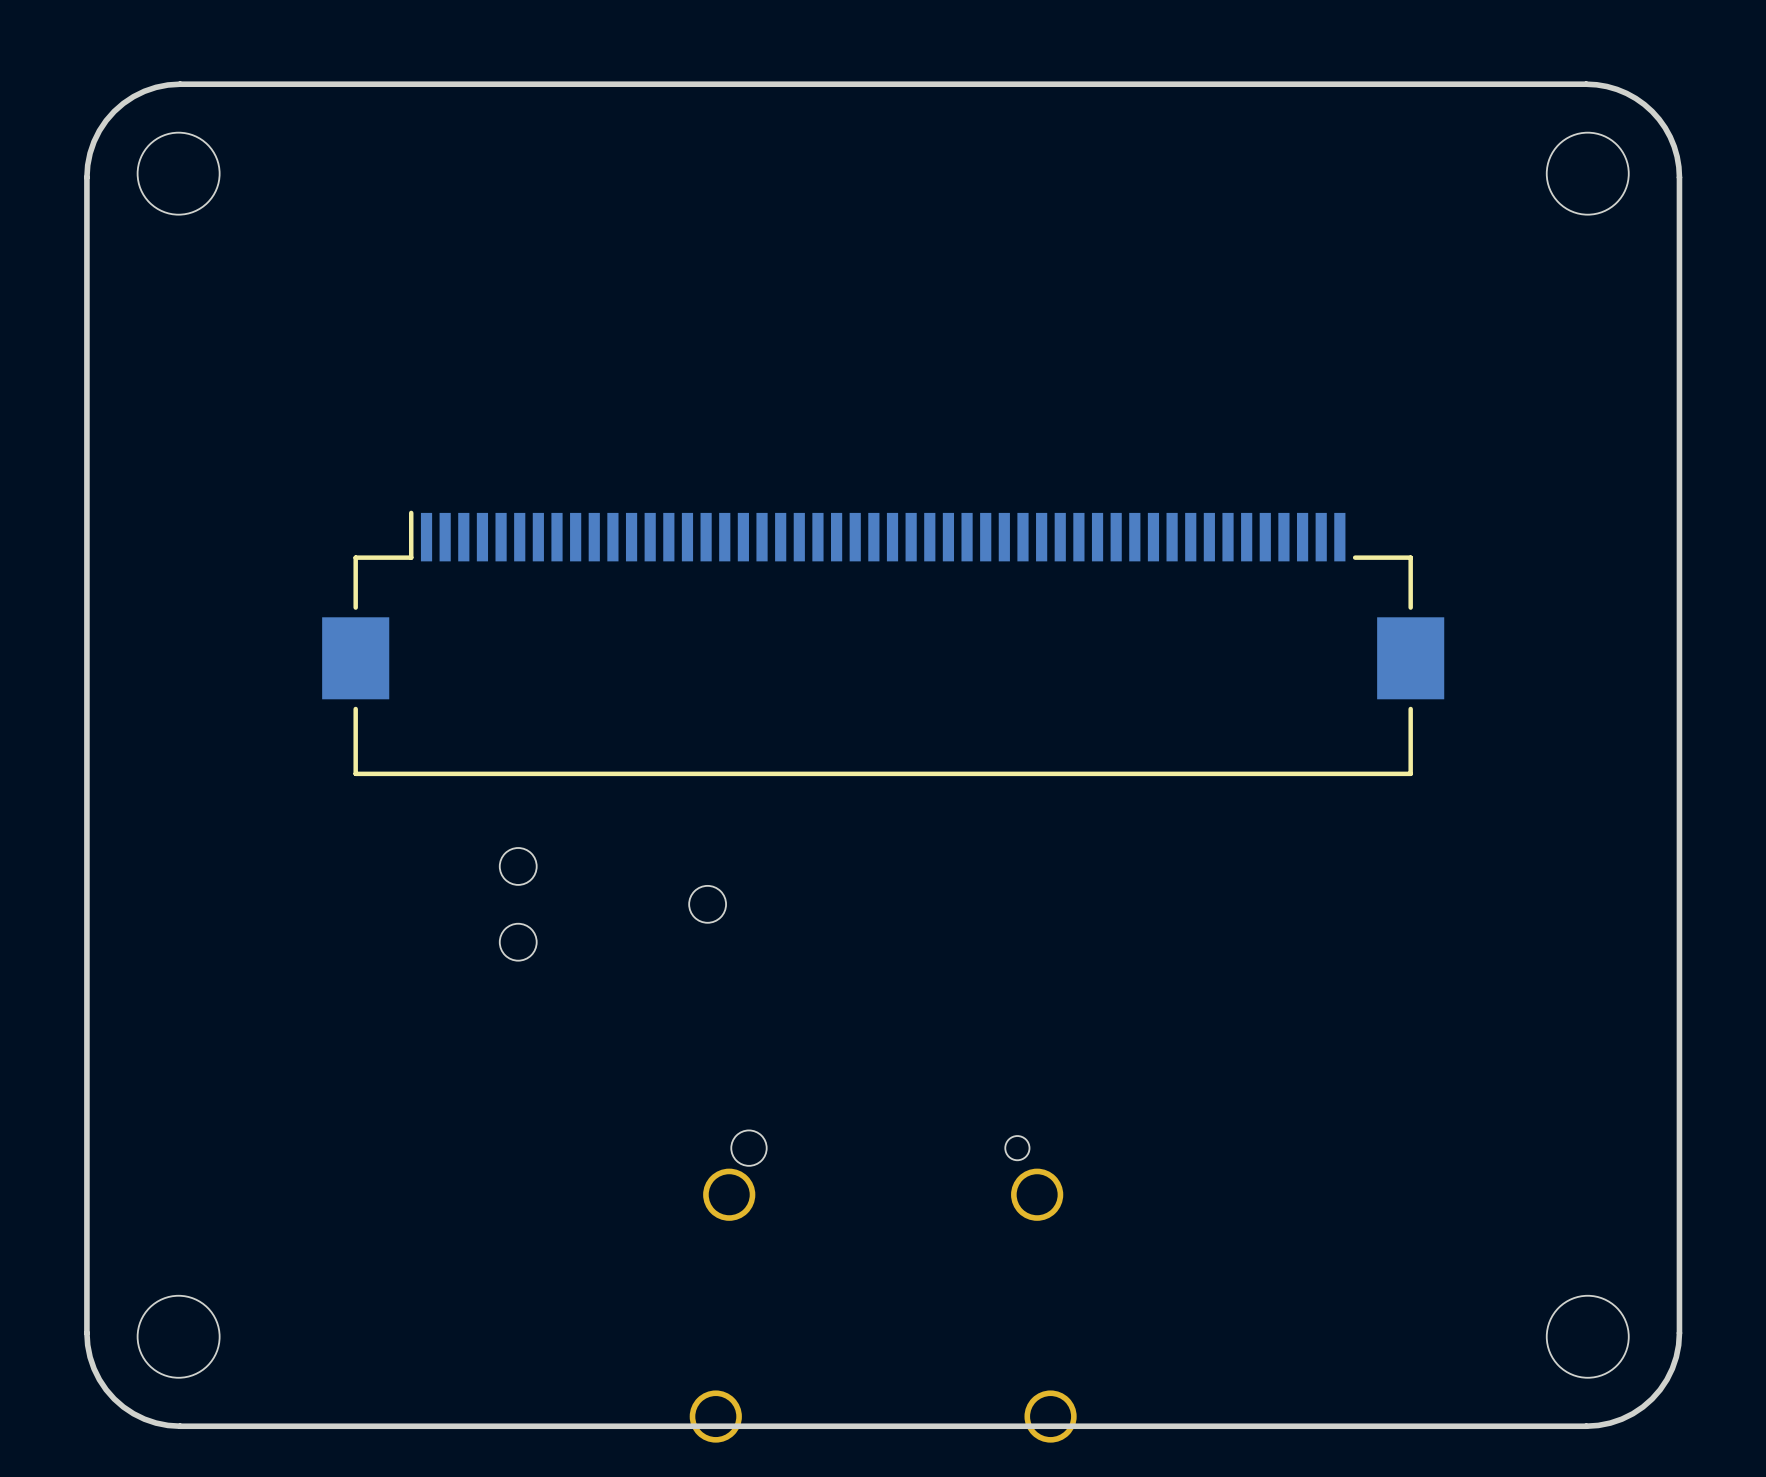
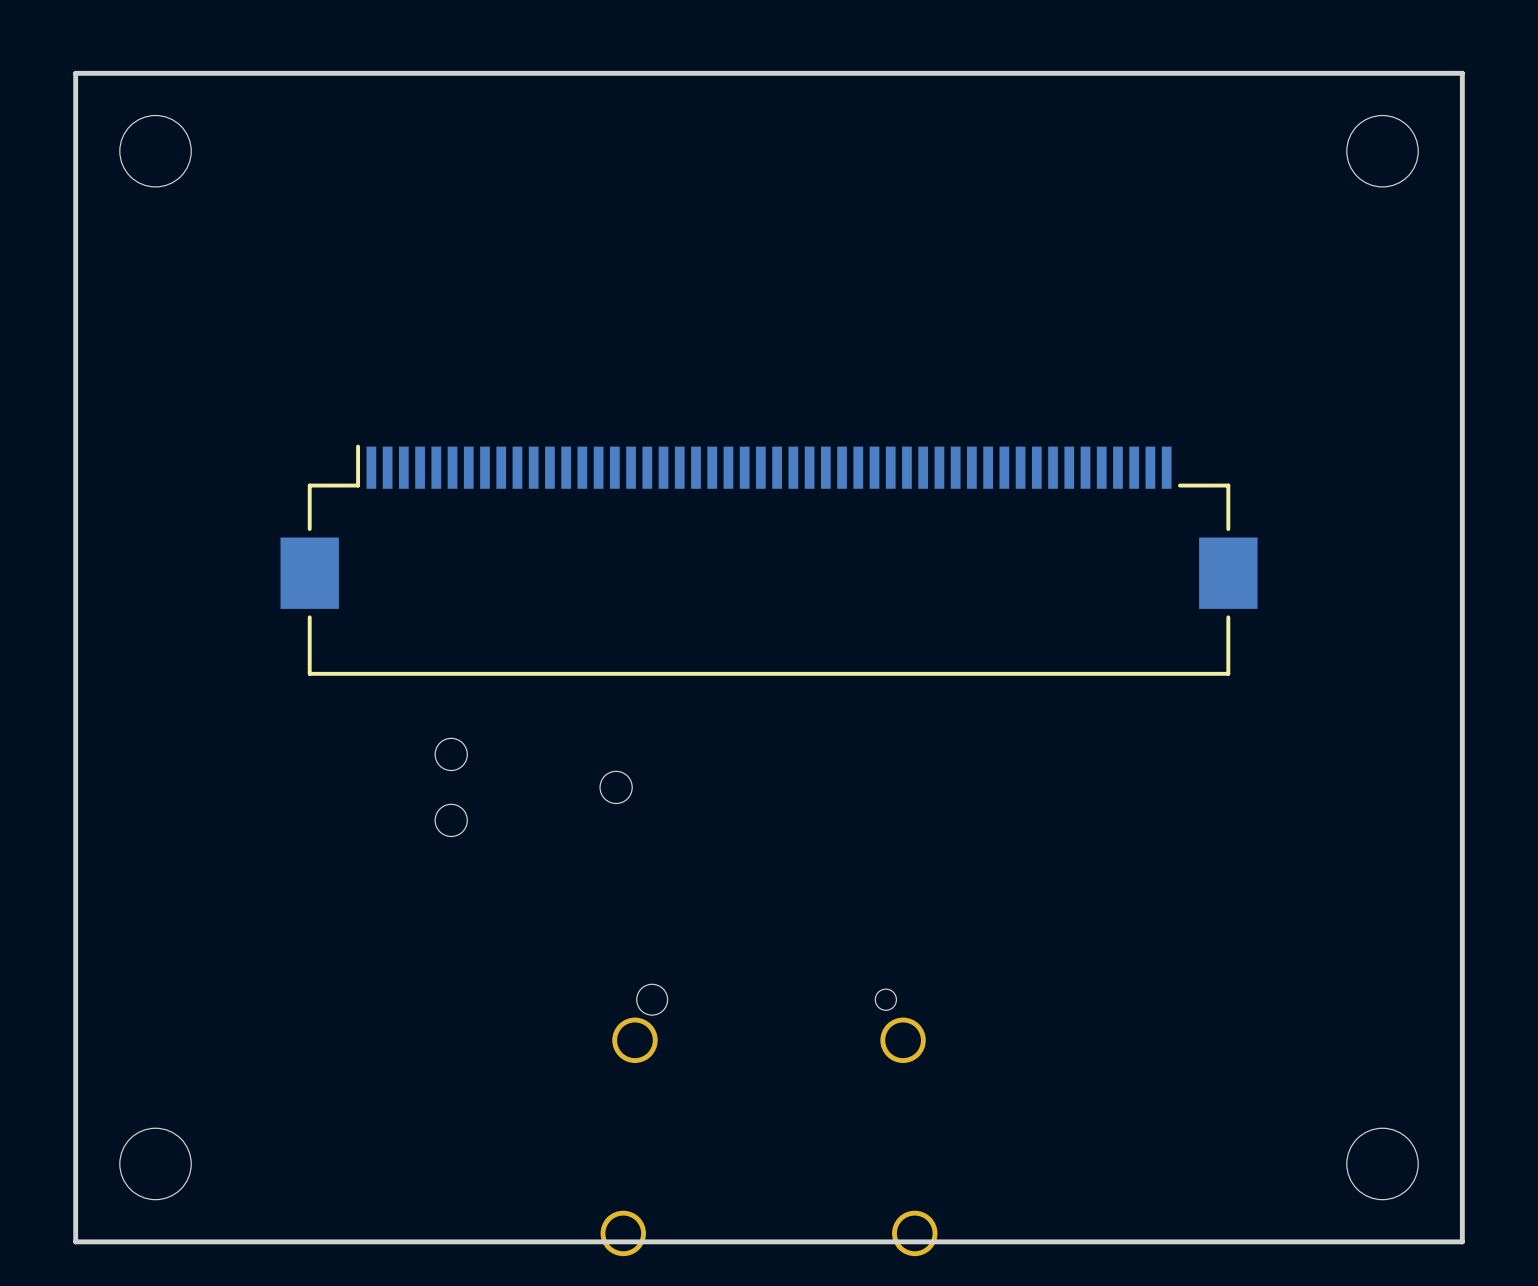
board edge: (180, 84) (167, 84) (144, 91) (133, 96) (114, 111) (99, 130) (94, 141) (87, 165) (86, 177) -> (156, 73) (75, 73) (75, 154)
board edge: (1586, 84) (1607, 86) (1626, 93) (1652, 111) (1670, 136) (1677, 156) (1679, 177) -> (1381, 73) (1462, 73) (1462, 154)
board edge: (86, 1333) (87, 1345) (94, 1368) (106, 1389) (114, 1398) (123, 1406) (144, 1419) (167, 1425) (180, 1426) -> (75, 1160) (75, 1241) (156, 1241)
board edge: (1679, 1333) (1676, 1357) (1672, 1368) (1666, 1379) (1652, 1398) (1643, 1406) (1621, 1419) (1598, 1425) (1586, 1426) -> (1462, 1160) (1462, 1241) (1381, 1241)

